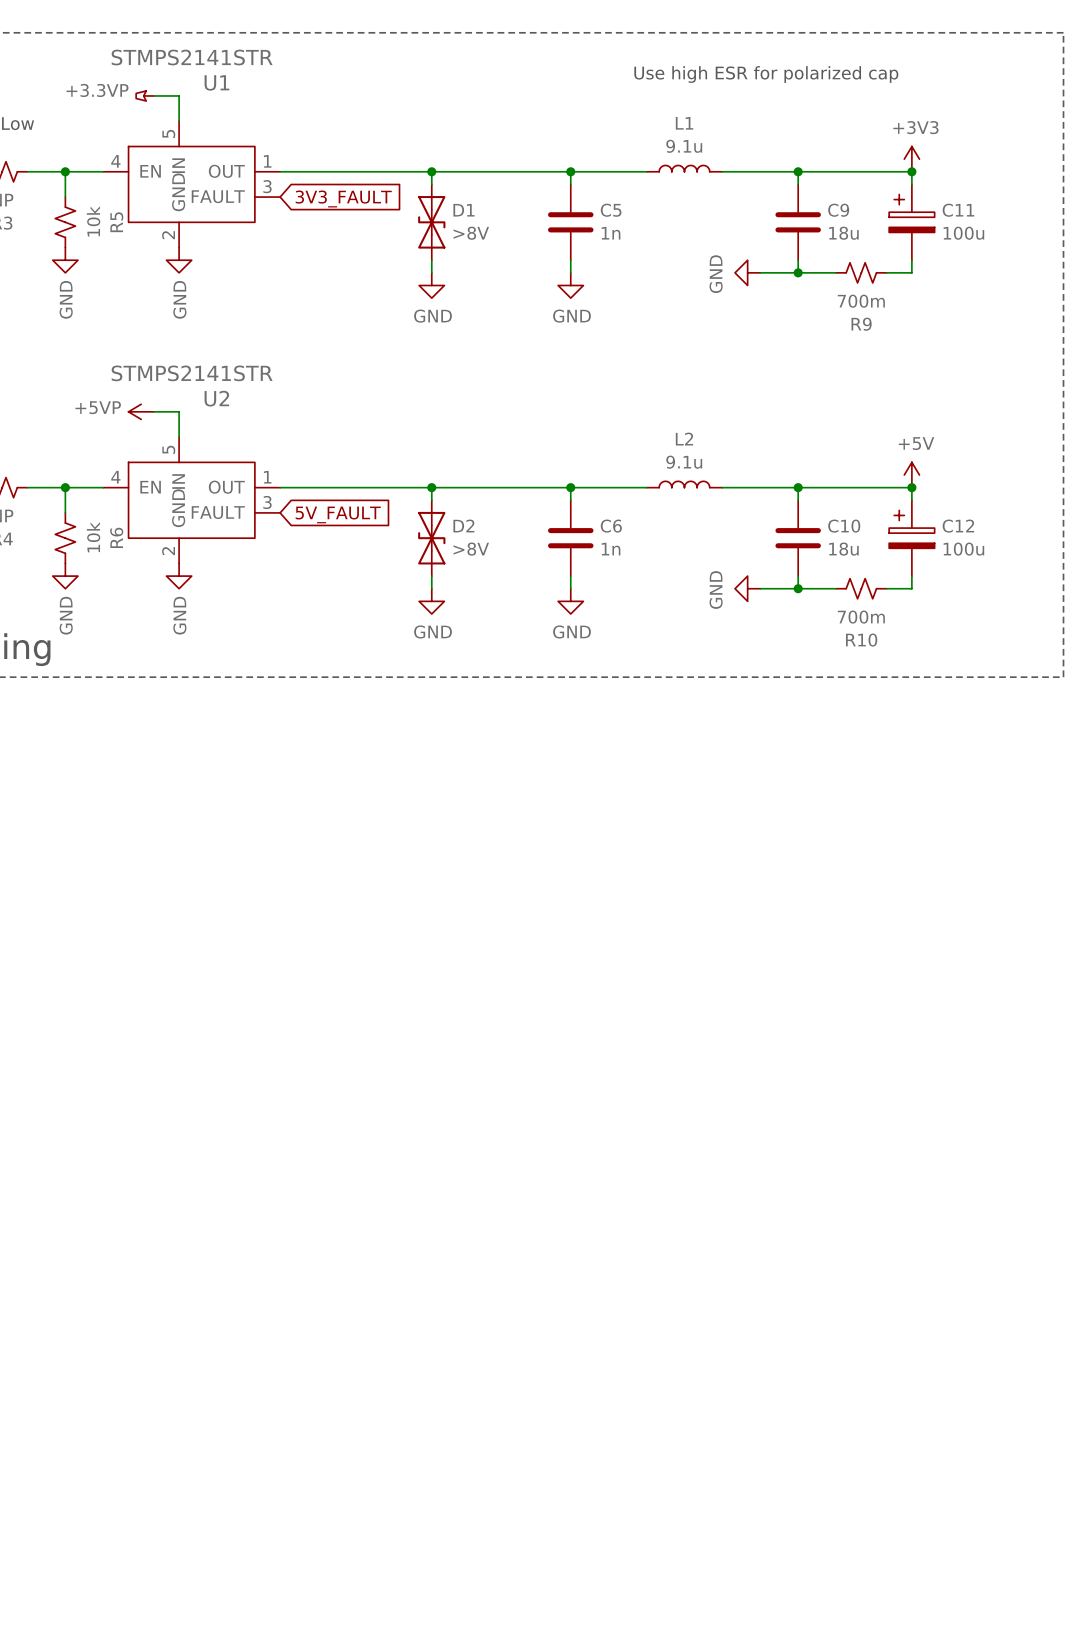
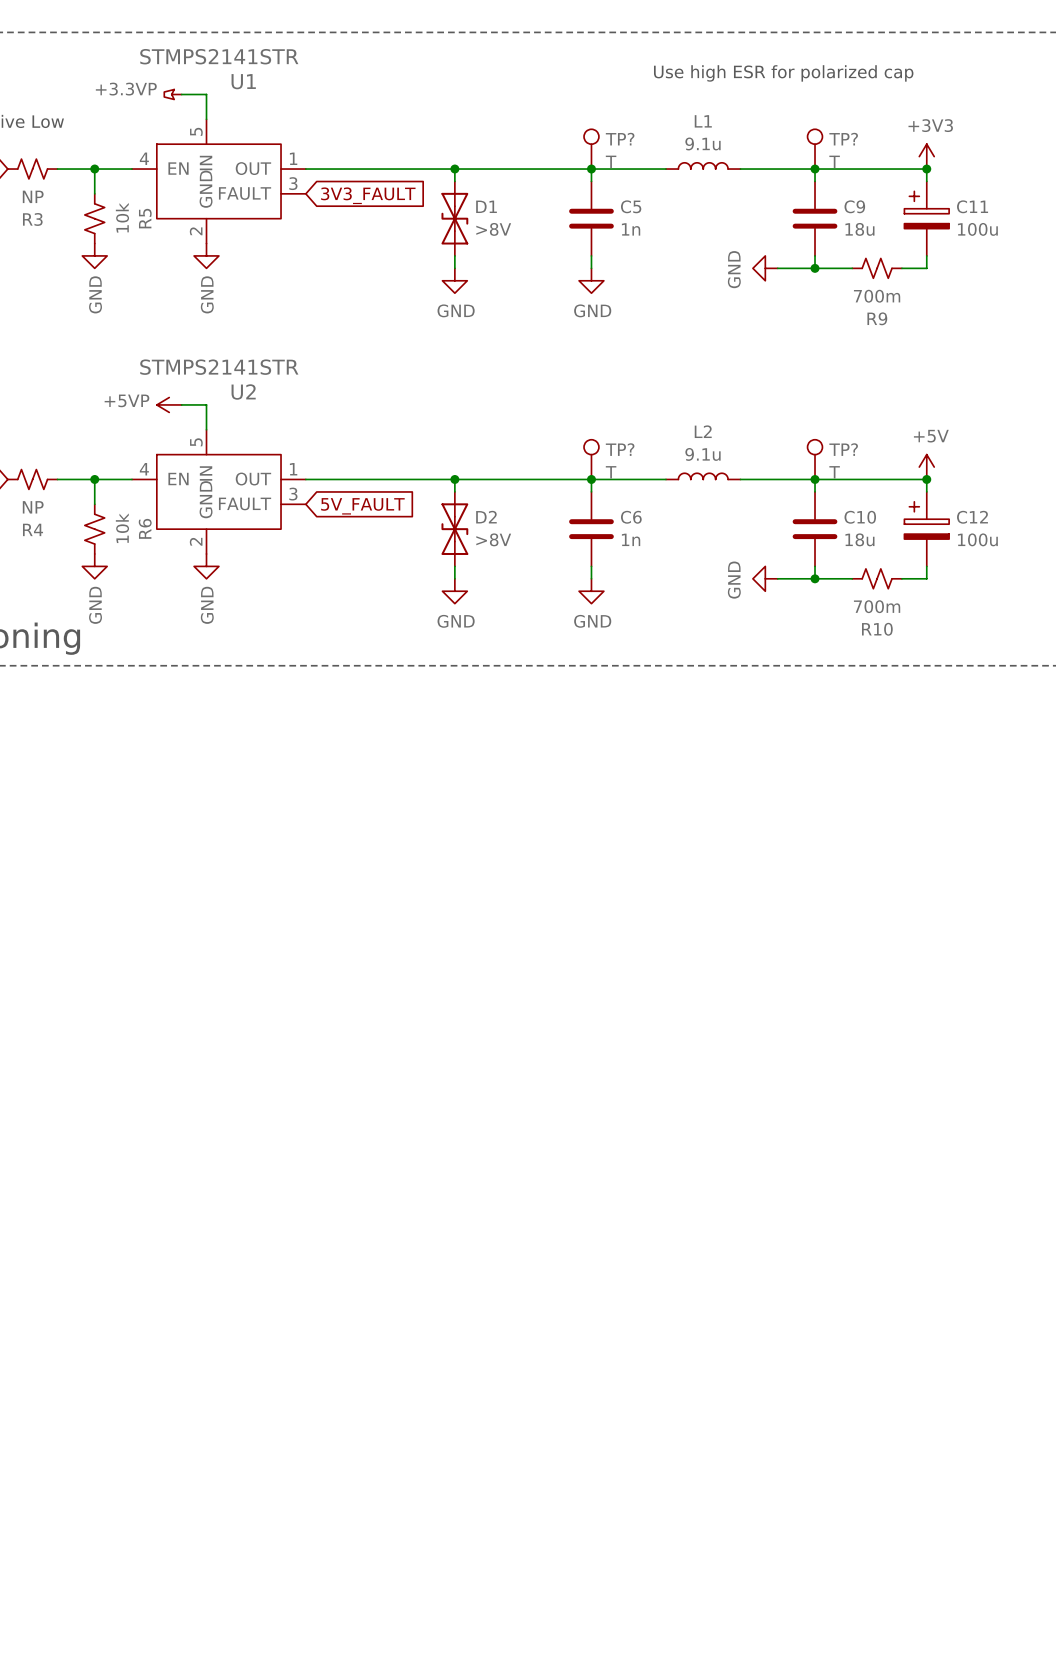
TP?: none -> T (591, 149)
TP?: none -> T (815, 149)
TP?: none -> T (591, 459)
TP?: none -> T (815, 459)

